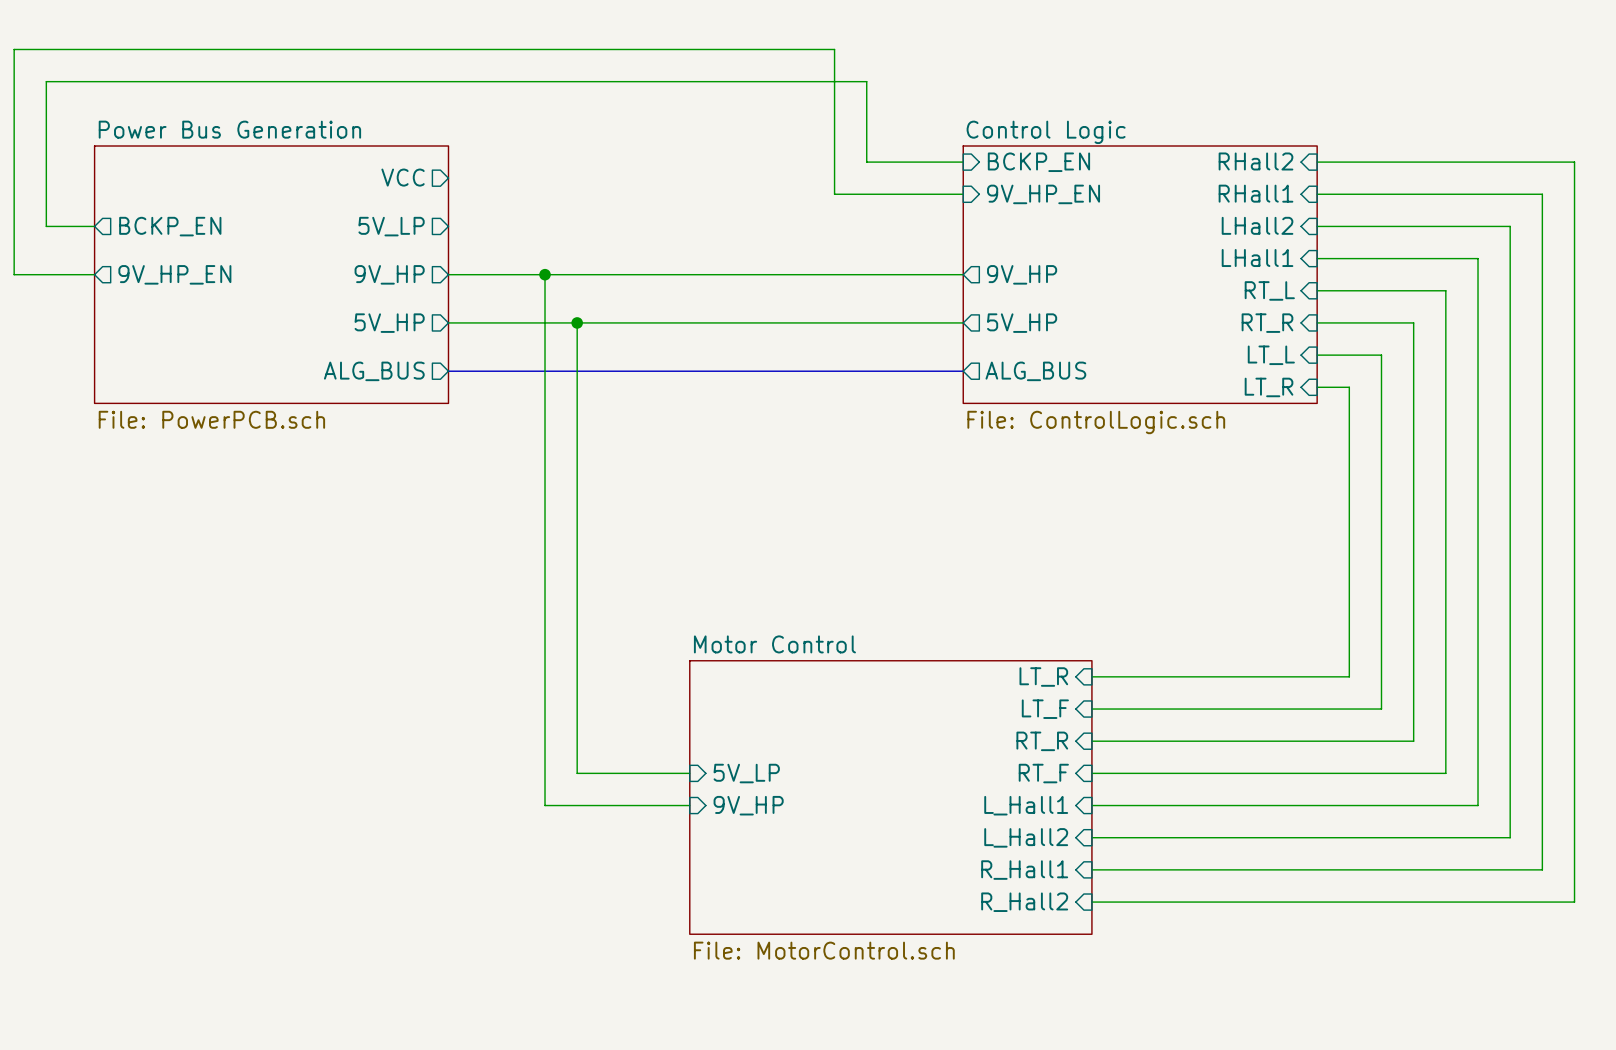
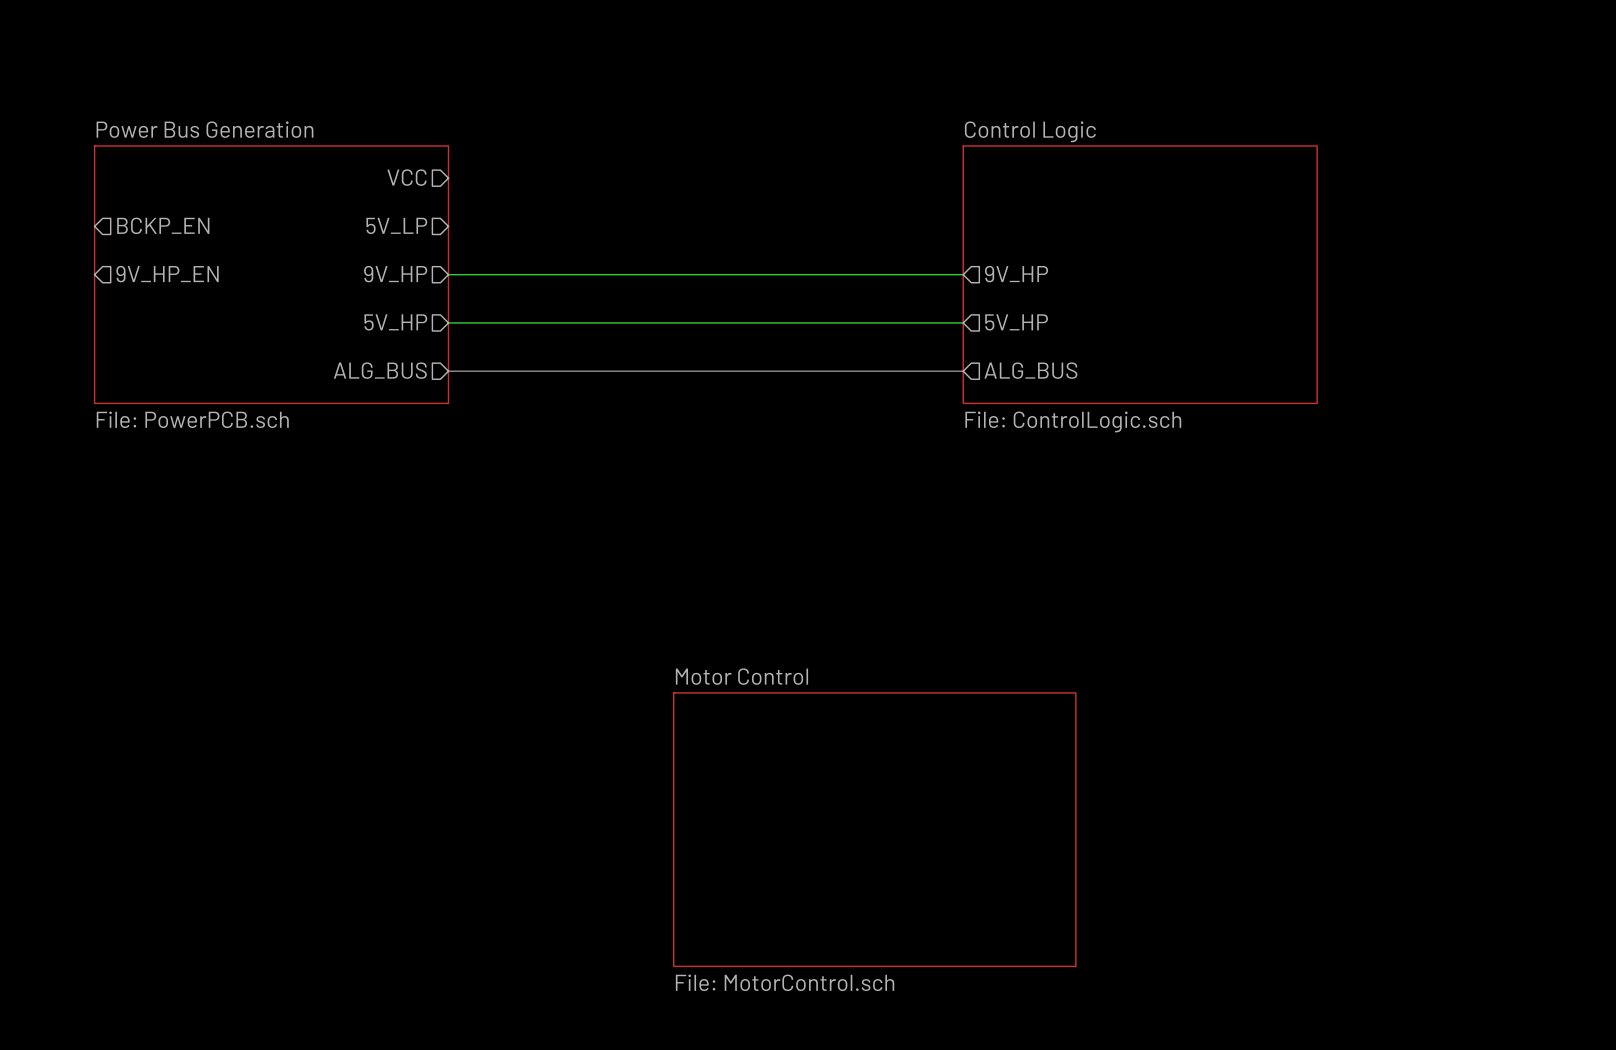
sheet pin: RHall2 (1255, 161) -> none
wire: (963, 162) (866, 162) (866, 81) (46, 81) (46, 226) (94, 226) -> none
sheet pin: BCKP_EN (1038, 162) -> none
wire: (1317, 162) (1574, 162) (1574, 902) (1091, 902) -> none
sheet pin: RHall1 (1255, 193) -> none
wire: (963, 194) (834, 194) (834, 49) (14, 49) (14, 274) (94, 274) -> none
sheet pin: 9V_HP_EN (1043, 194) -> none
wire: (1317, 194) (1542, 194) (1542, 869) (1091, 869) -> none
sheet pin: LHall2 (1257, 225) -> none
wire: (1317, 226) (1510, 226) (1510, 837) (1091, 837) -> none
sheet pin: LHall1 (1257, 258) -> none
wire: (1317, 258) (1478, 258) (1478, 805) (1091, 805) -> none
wire: (545, 274) (545, 805) (689, 805) -> none
junction: (545, 274) -> none
sheet pin: RT_L (1269, 290) -> none
wire: (1317, 290) (1445, 290) (1445, 773) (1091, 773) -> none
wire: (577, 322) (577, 773) (689, 773) -> none
junction: (577, 322) -> none
wire: (1317, 322) (1413, 322) (1413, 741) (1091, 741) -> none
sheet pin: RT_R (1267, 323) -> none
sheet pin: LT_L (1271, 355) -> none
wire: (1317, 355) (1381, 355) (1381, 709) (1091, 709) -> none
sheet pin: LT_R (1269, 387) -> none
wire: (1317, 387) (1349, 387) (1349, 676) (1091, 676) -> none
sheet pin: LT_R (1043, 677) -> none
sheet pin: LT_F (1045, 709) -> none
sheet pin: RT_R (1042, 741) -> none
sheet pin: 5V_LP (746, 773) -> none
sheet pin: RT_F (1043, 773) -> none
sheet Motor Control position: (890, 797) -> (874, 829)
sheet pin: 9V_HP (748, 805) -> none
sheet pin: L_Hall1 (1026, 805) -> none
sheet pin: L_Hall2 (1026, 837) -> none
sheet pin: R_Hall1 (1024, 870) -> none
sheet pin: R_Hall2 (1024, 902) -> none

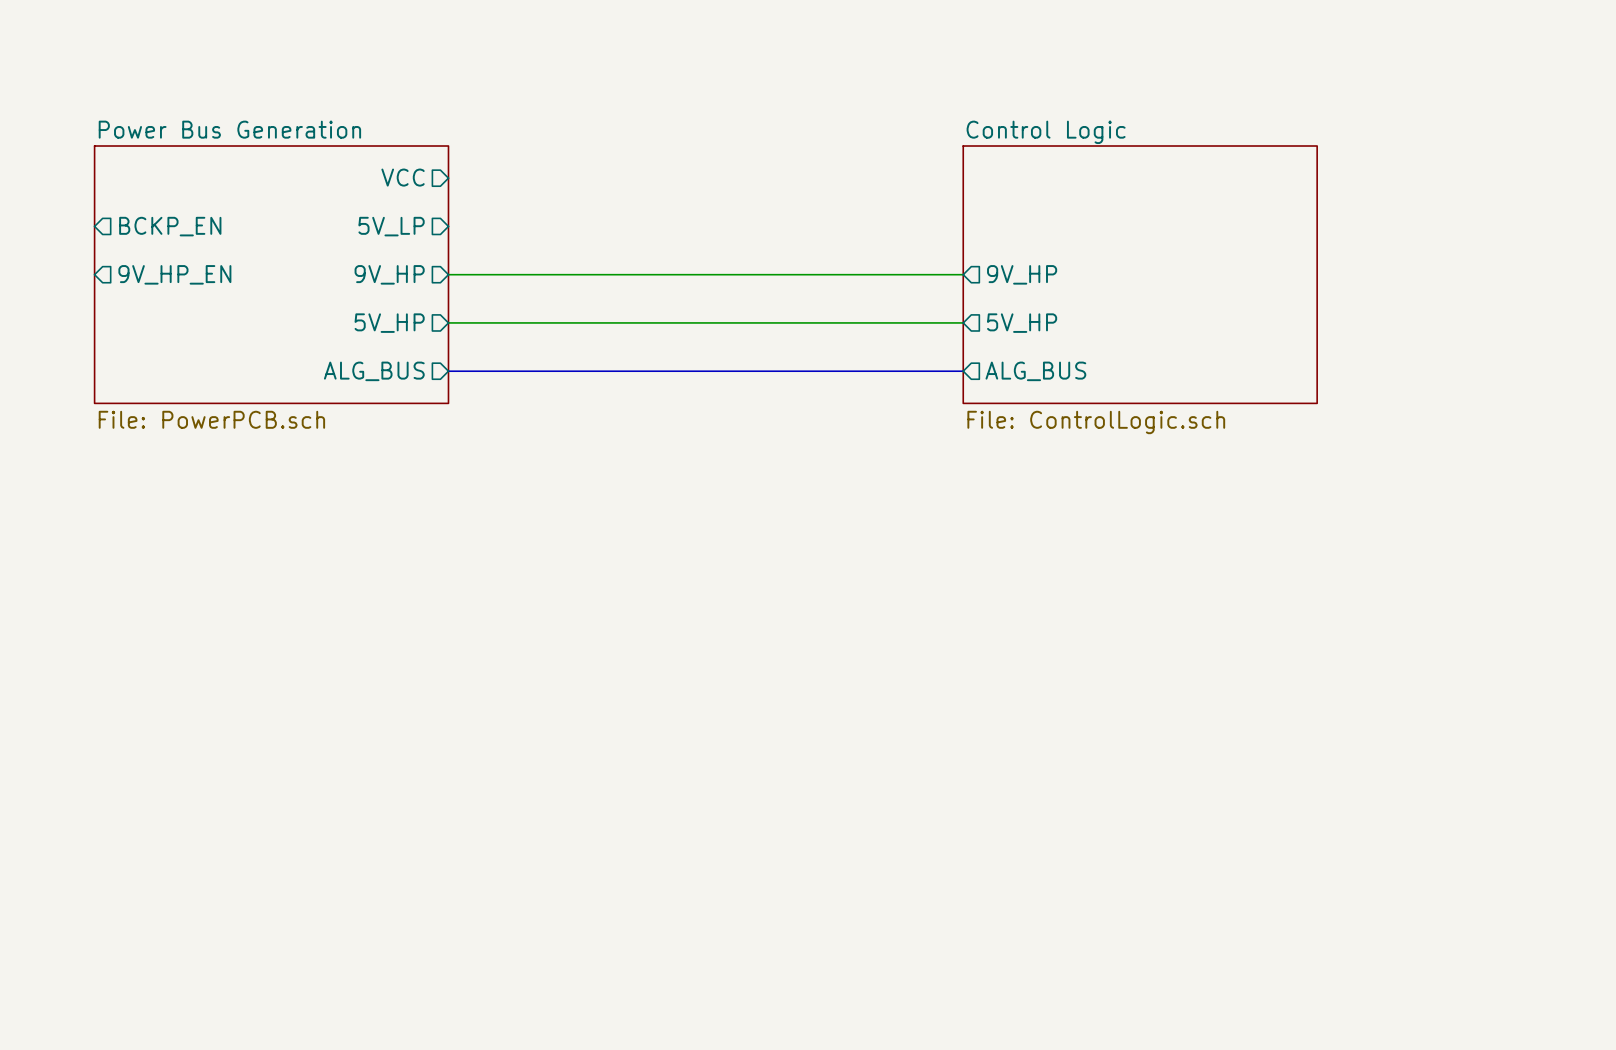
sheet Motor Control: File: MotorControl.sch (874, 829) -> none

